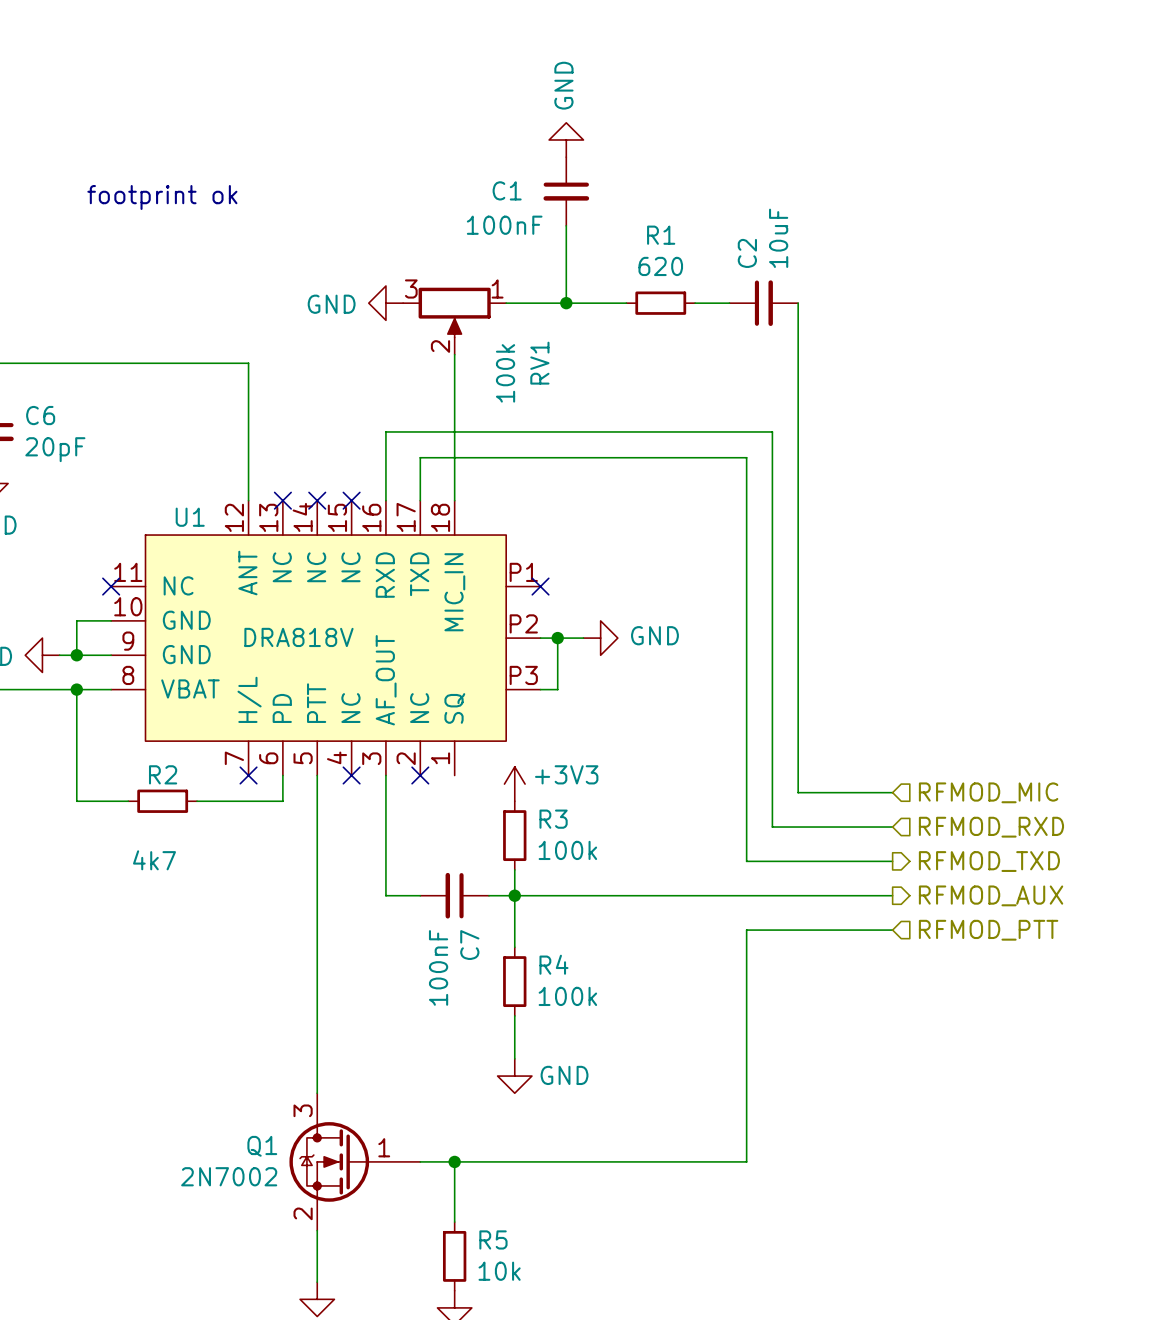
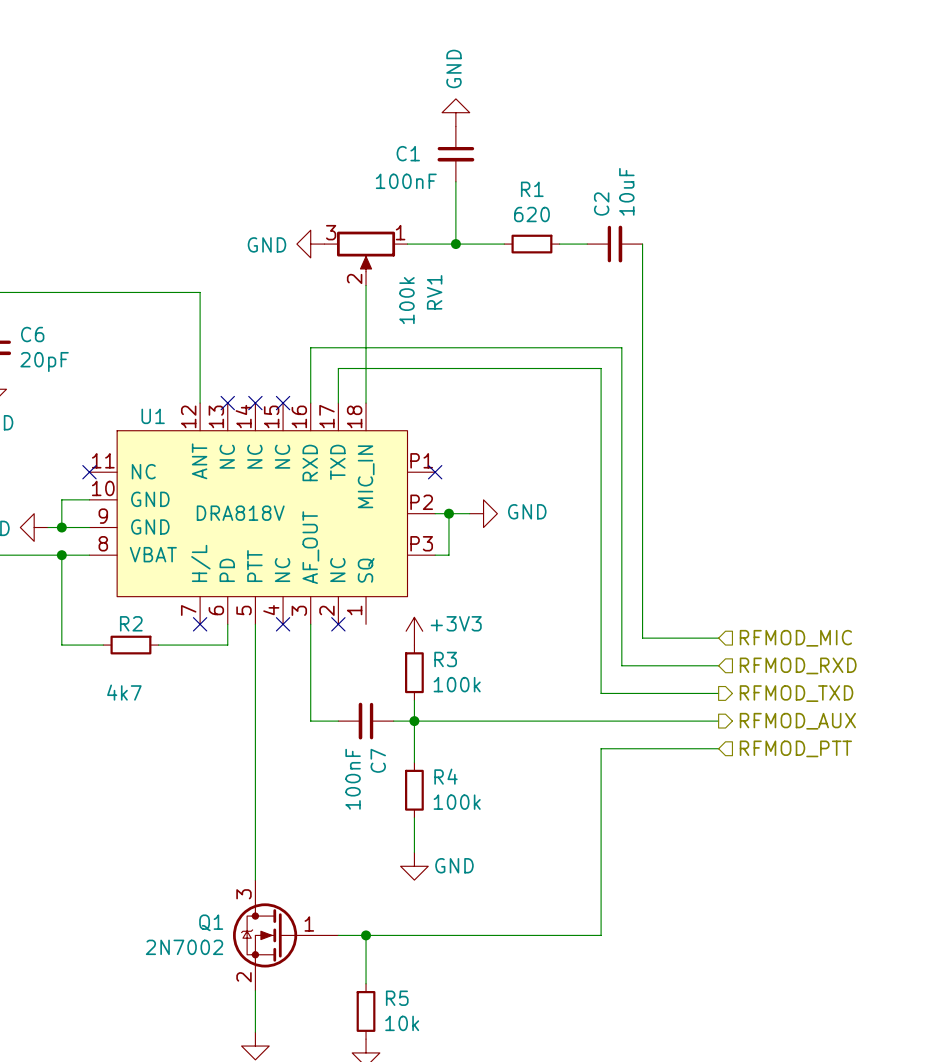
text: footprint ok (162, 197) -> none

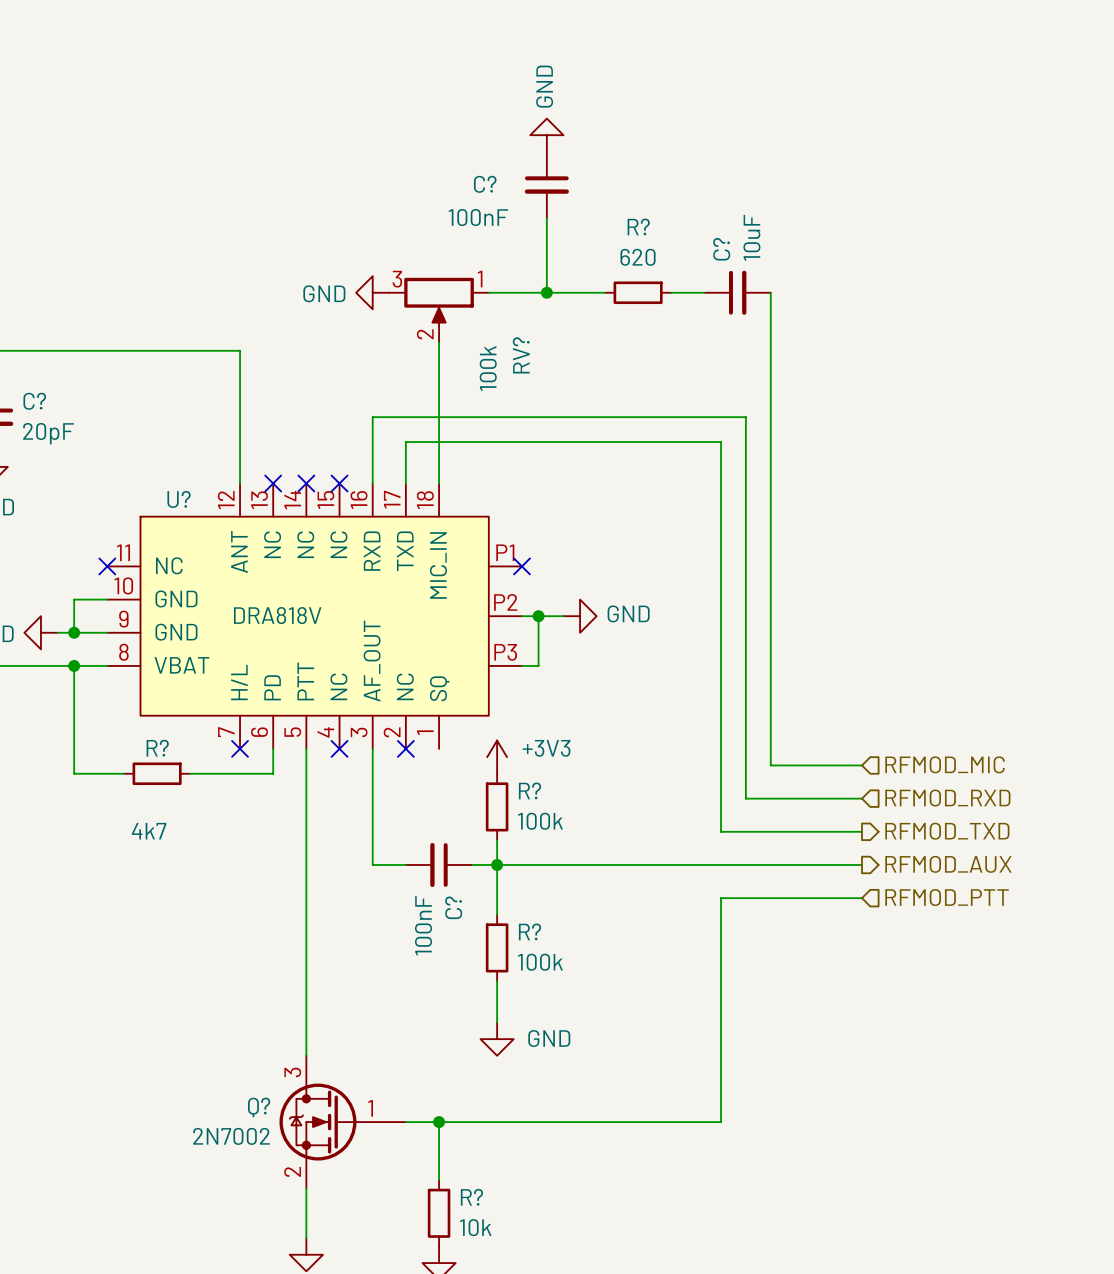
C1 name: C1 (408, 153) -> C? (485, 184)
R1 name: R1 (532, 189) -> R? (638, 227)
C2 name: C2 (601, 204) -> C? (721, 249)
RV1 name: RV1 (434, 292) -> RV? (521, 355)
C6 name: C6 (32, 334) -> C? (34, 401)
U1 name: U1 (153, 416) -> U? (179, 499)
R2 name: R2 (131, 623) -> R? (157, 748)
R3 name: R3 (445, 659) -> R? (530, 790)
C7 name: C7 (378, 760) -> C? (453, 907)
R4 name: R4 (445, 776) -> R? (530, 931)
Q1 name: Q1 (211, 922) -> Q? (259, 1107)
R5 name: R5 (397, 998) -> R? (471, 1197)

